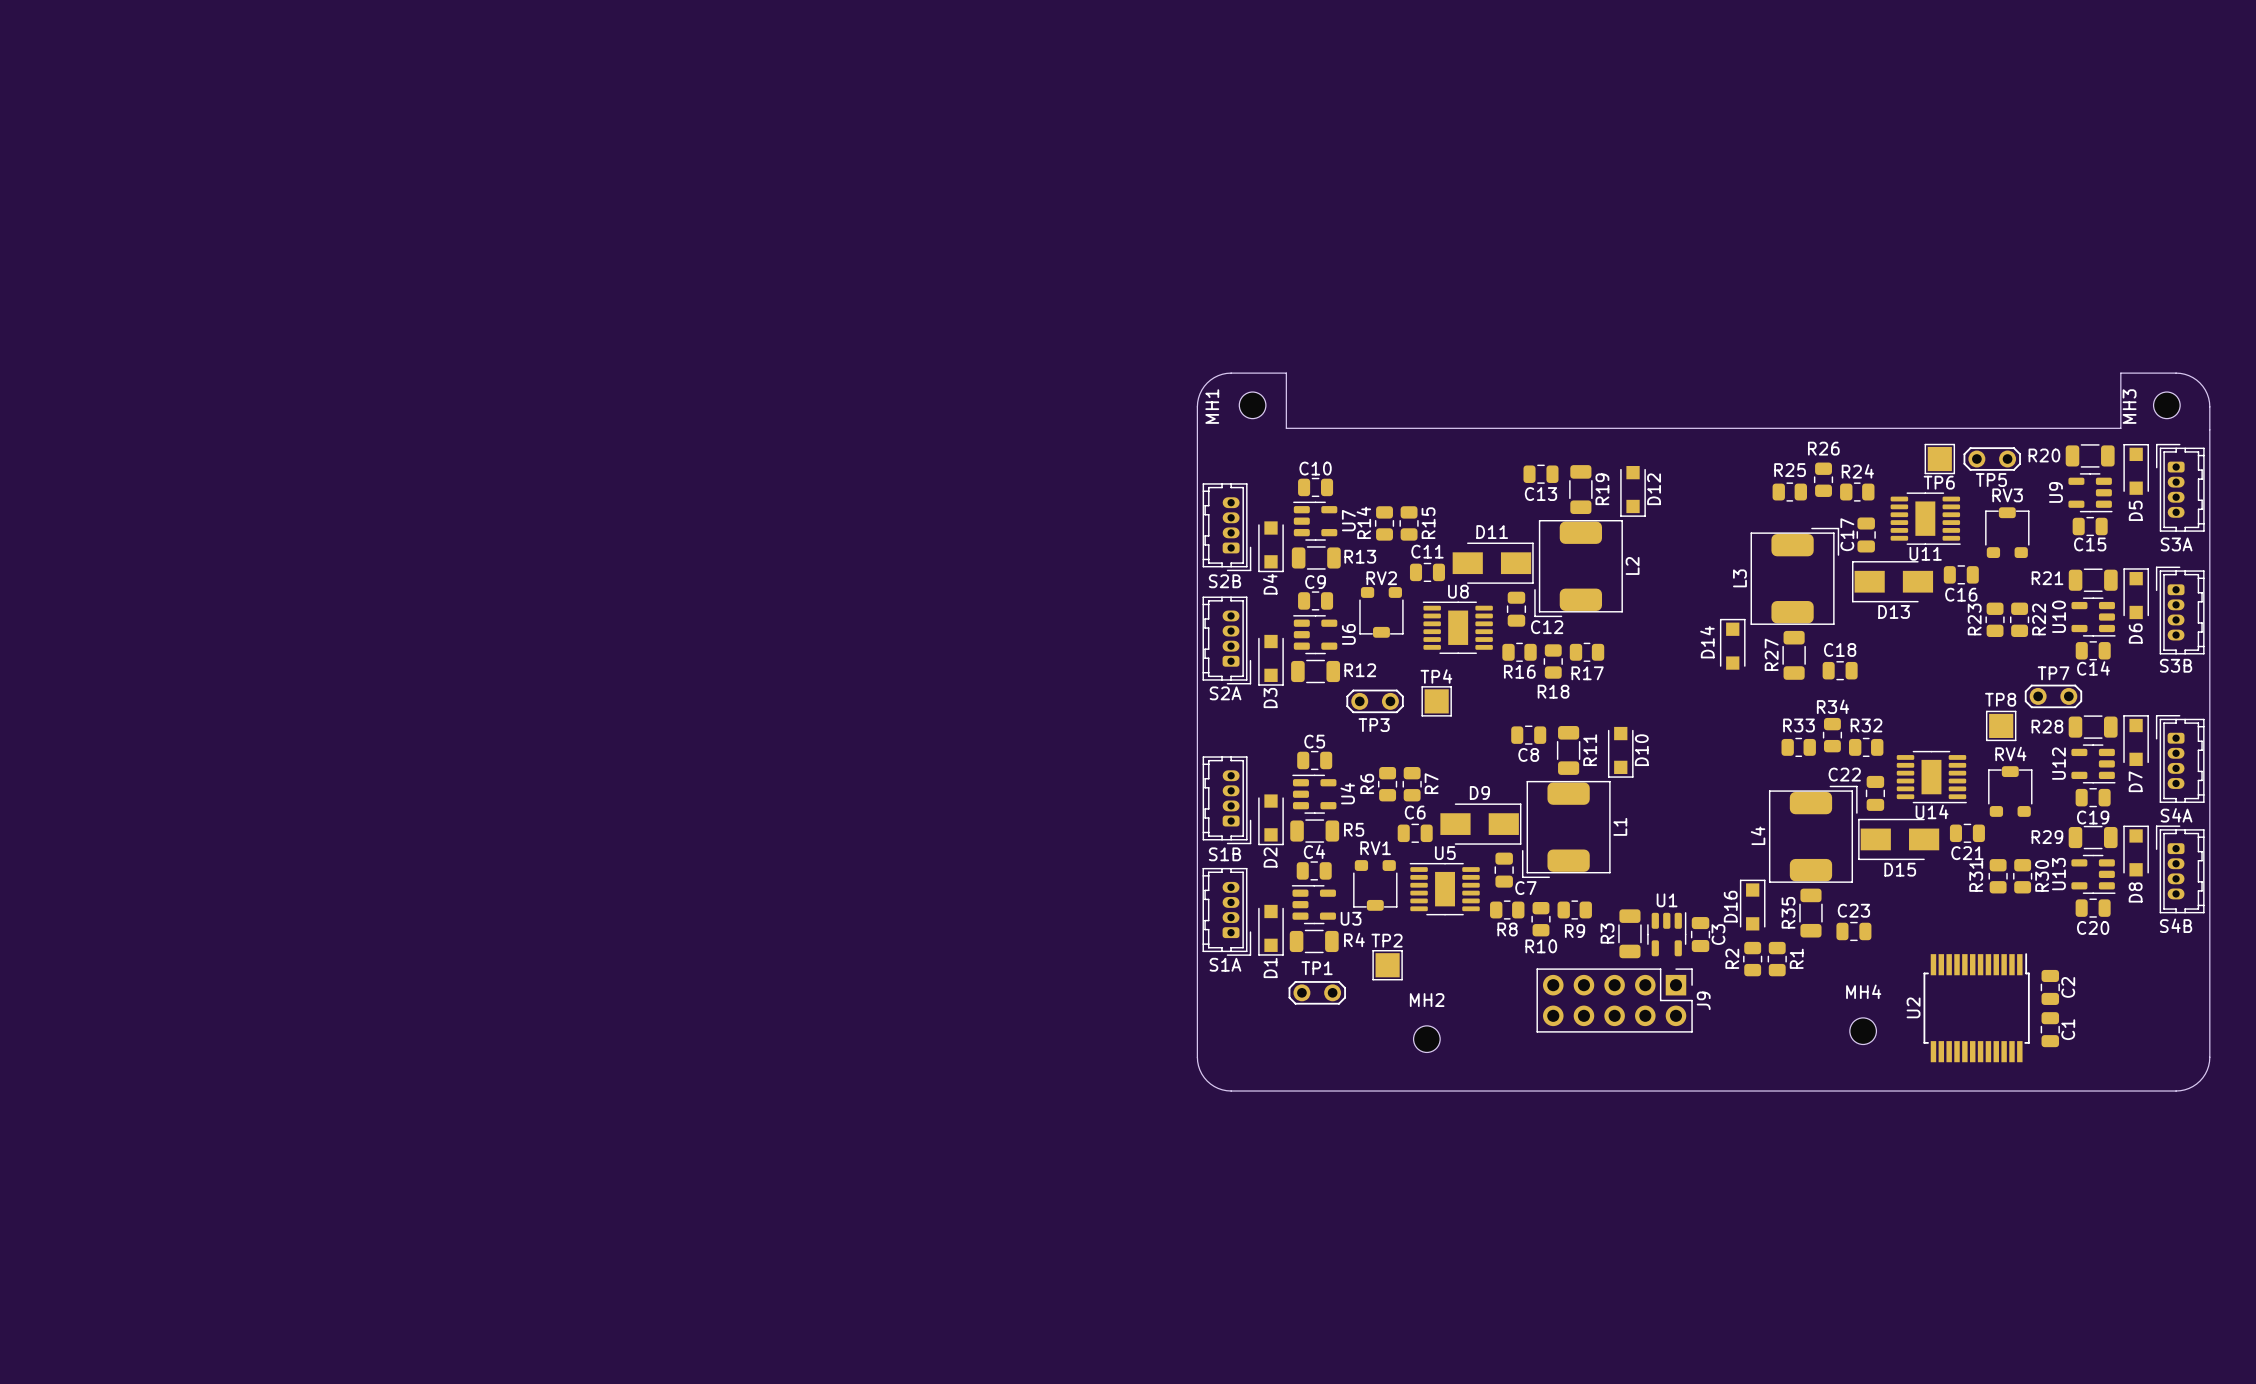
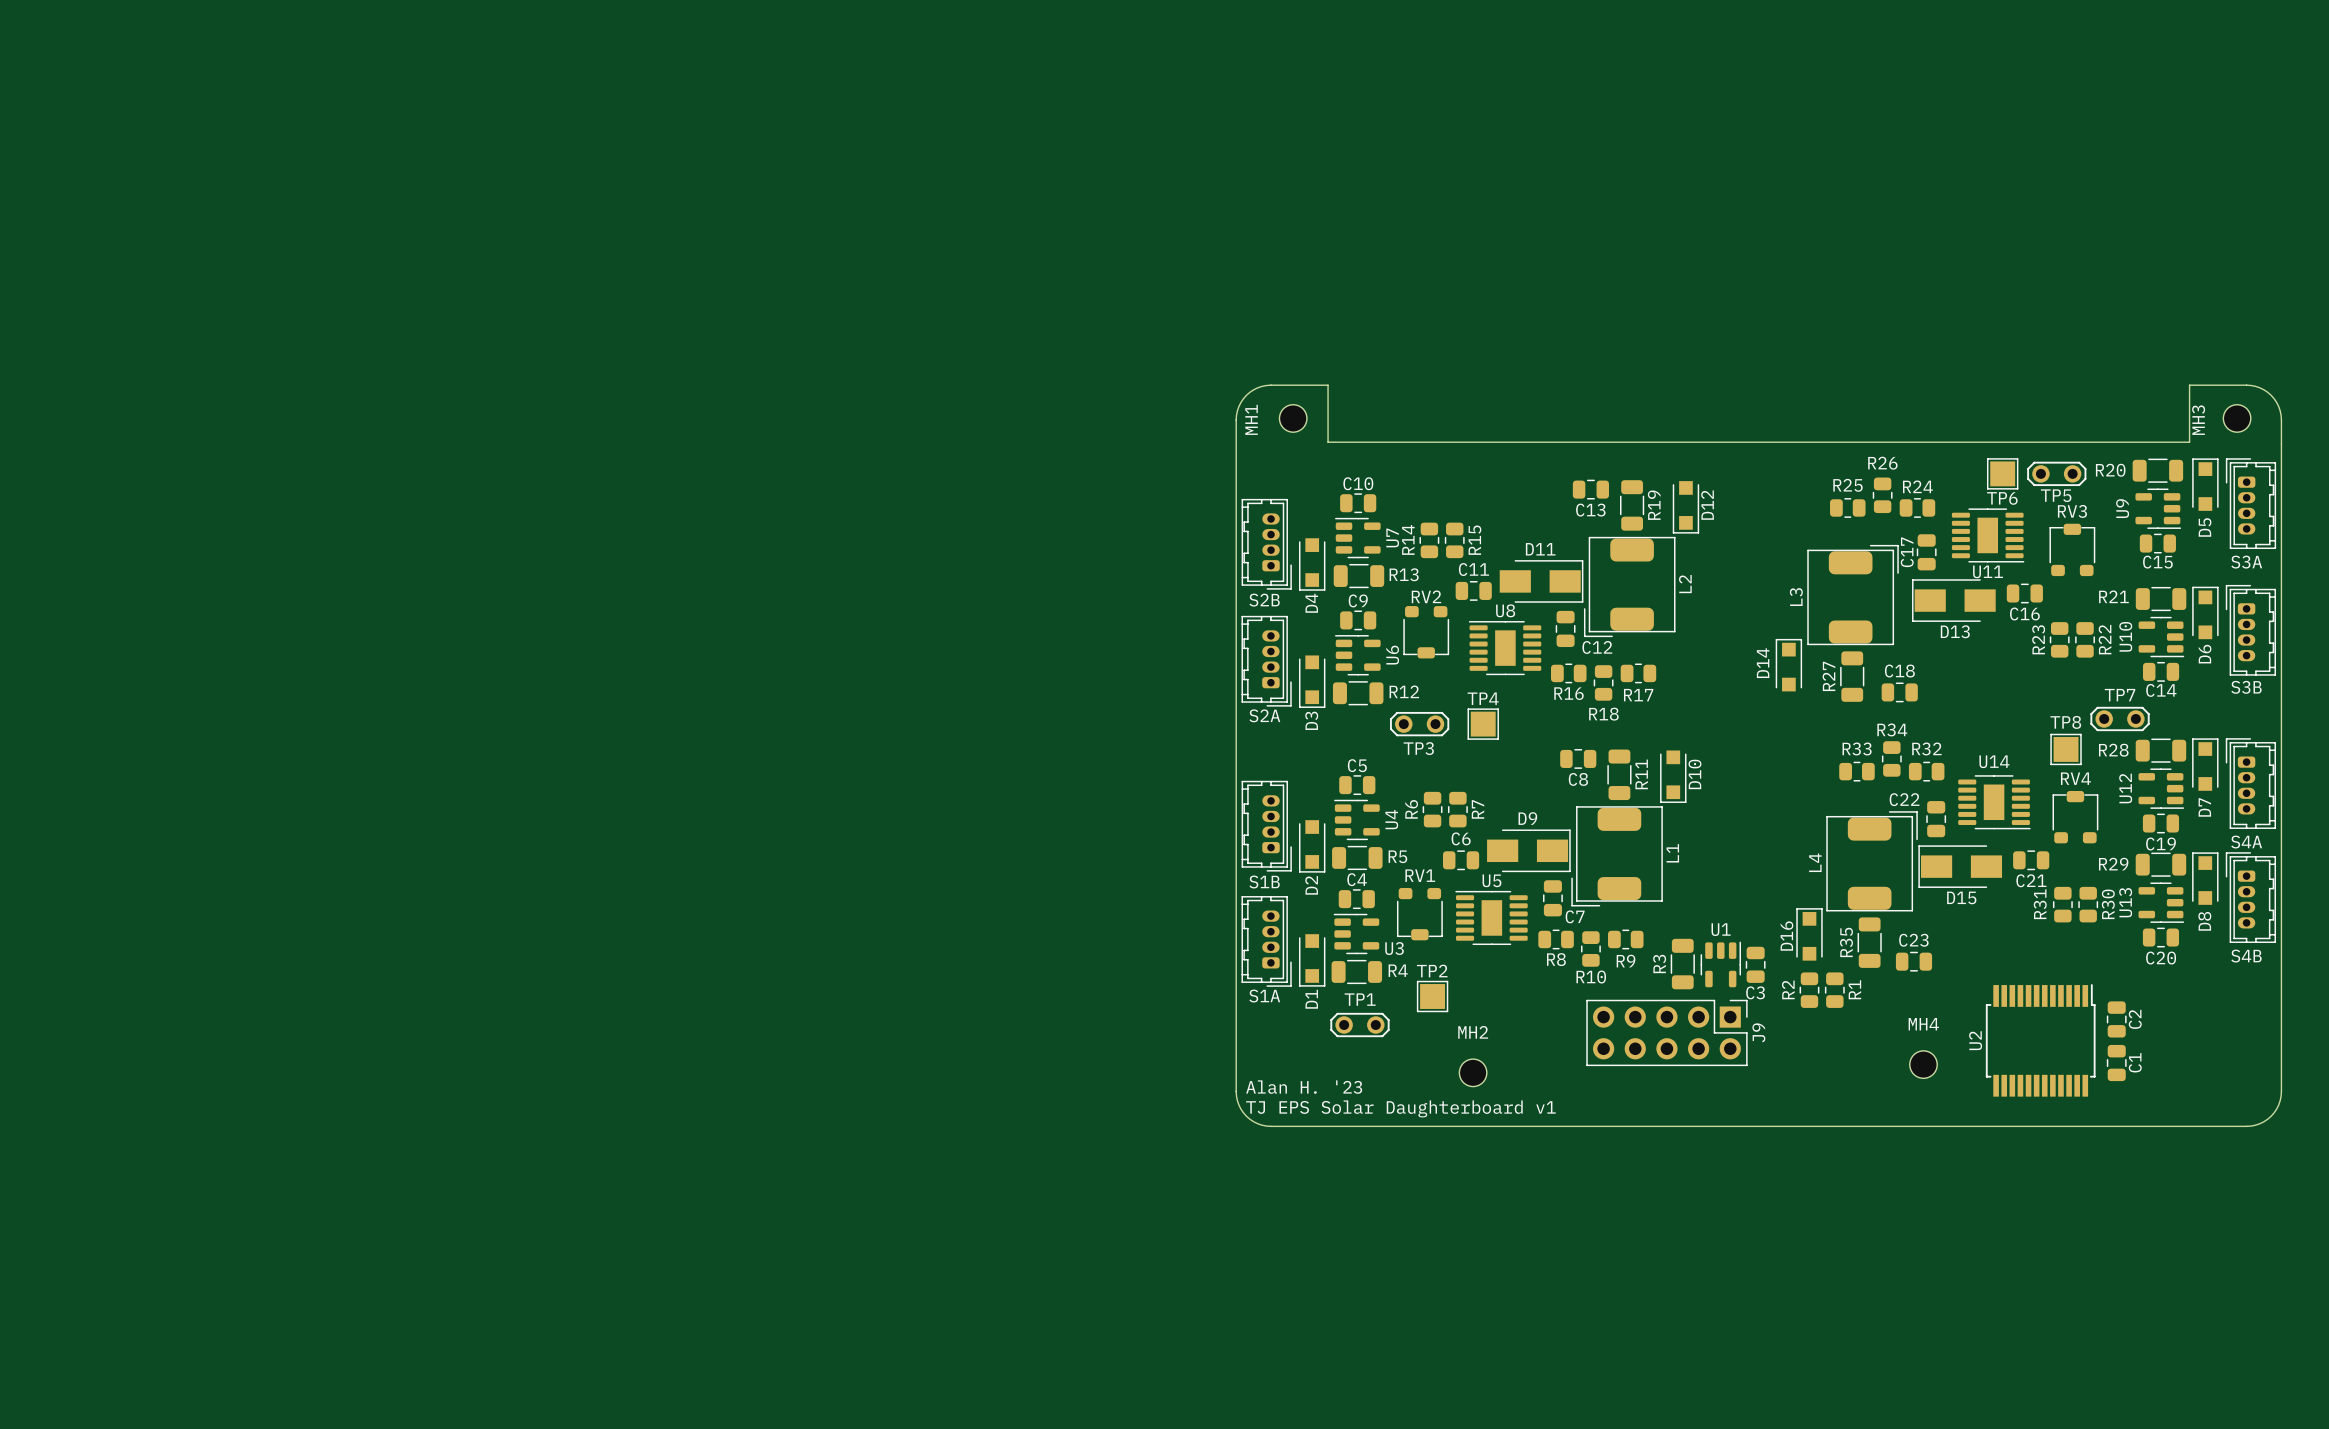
U14 name position: U14 (1932, 811) -> U14 (1994, 761)
C3 name rotation: 0° (1718, 934) -> 90° clockwise (1755, 992)
C3 name position: C3 (1718, 934) -> C3 (1755, 992)
text: none -> Alan H. '23 (1304, 1087)
text: none -> TJ EPS Solar Daughterboard v1 (1400, 1108)

